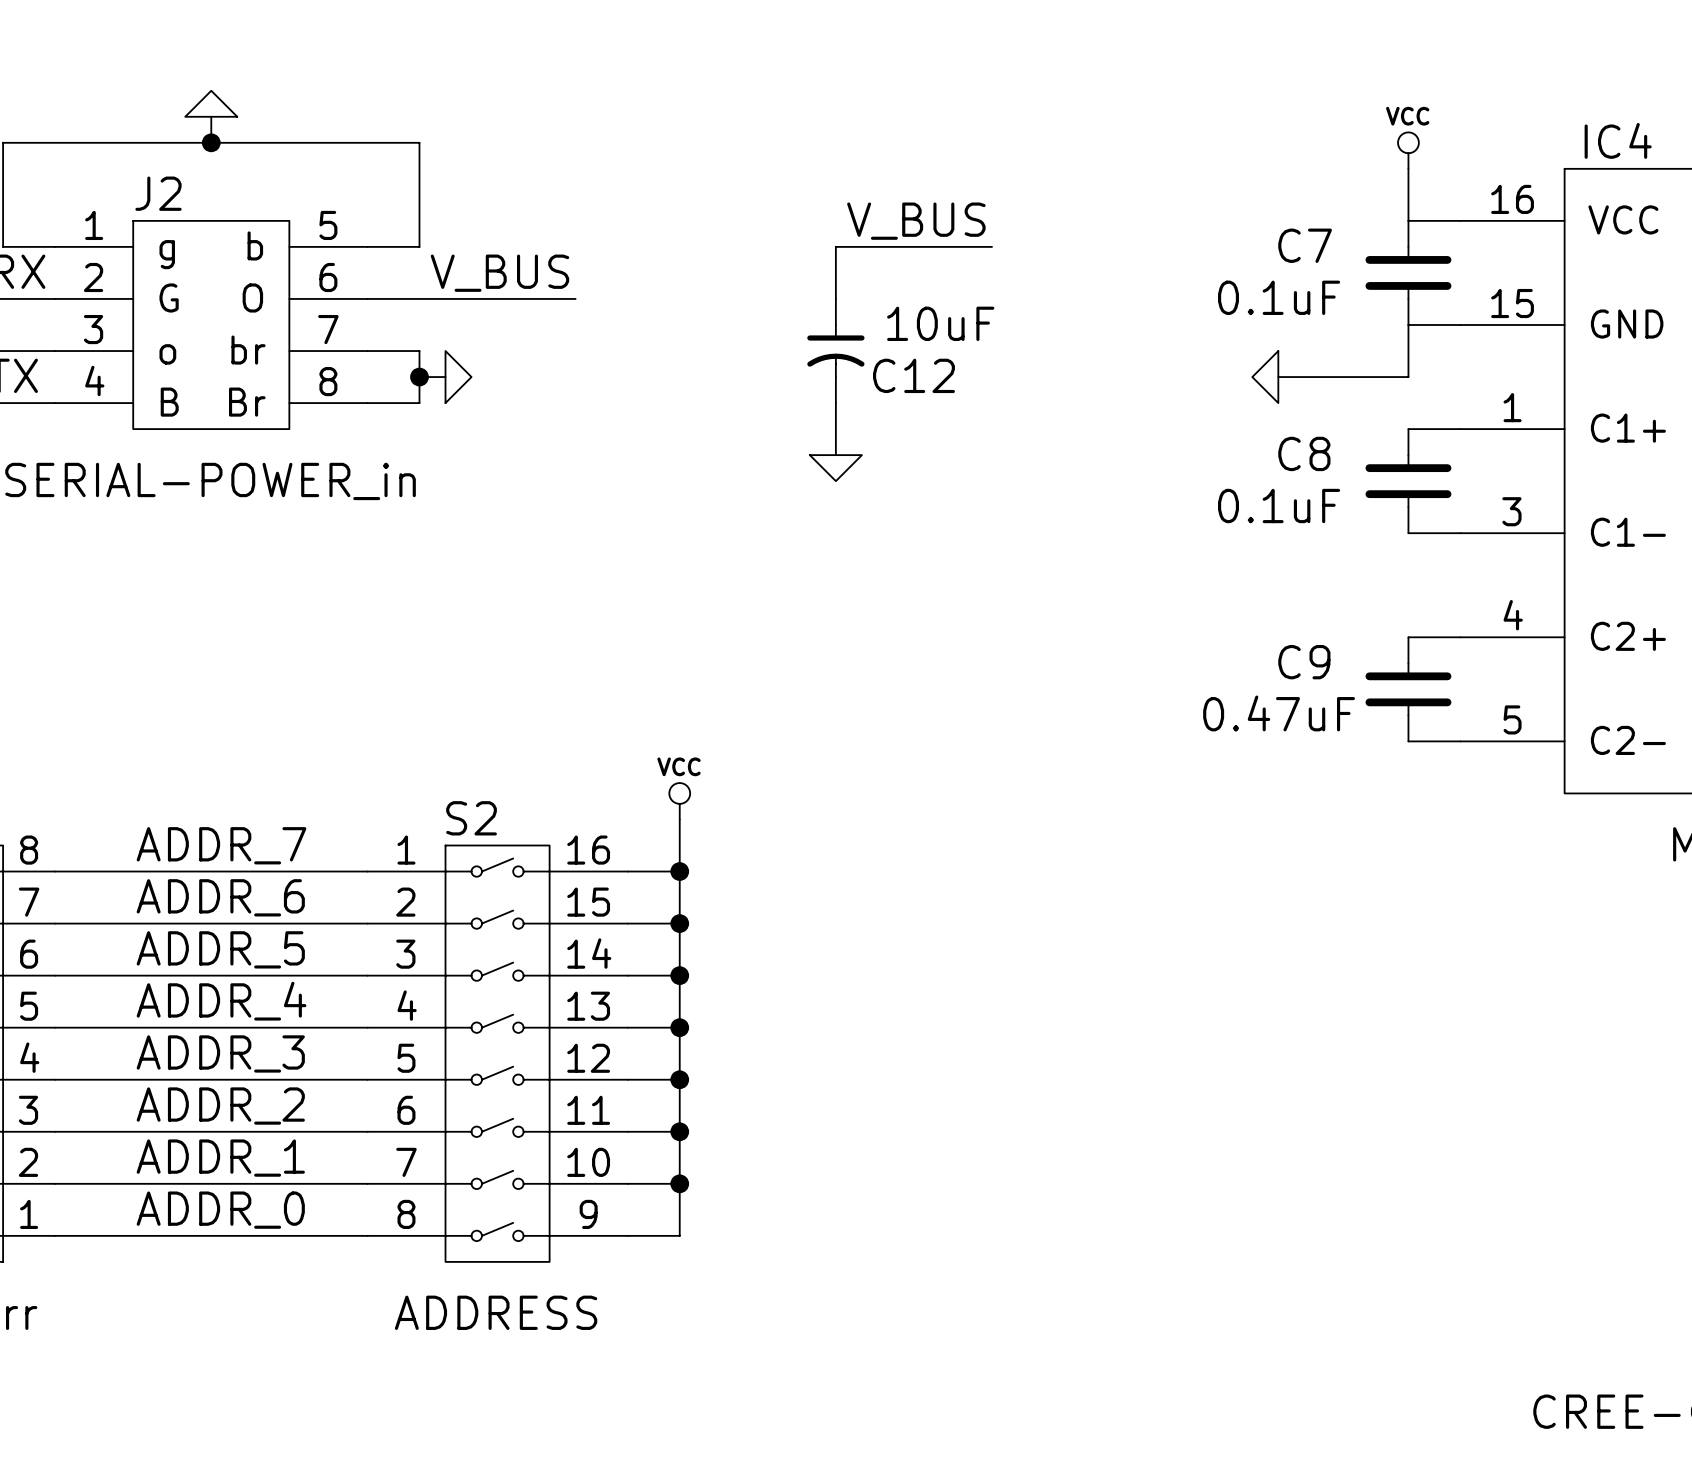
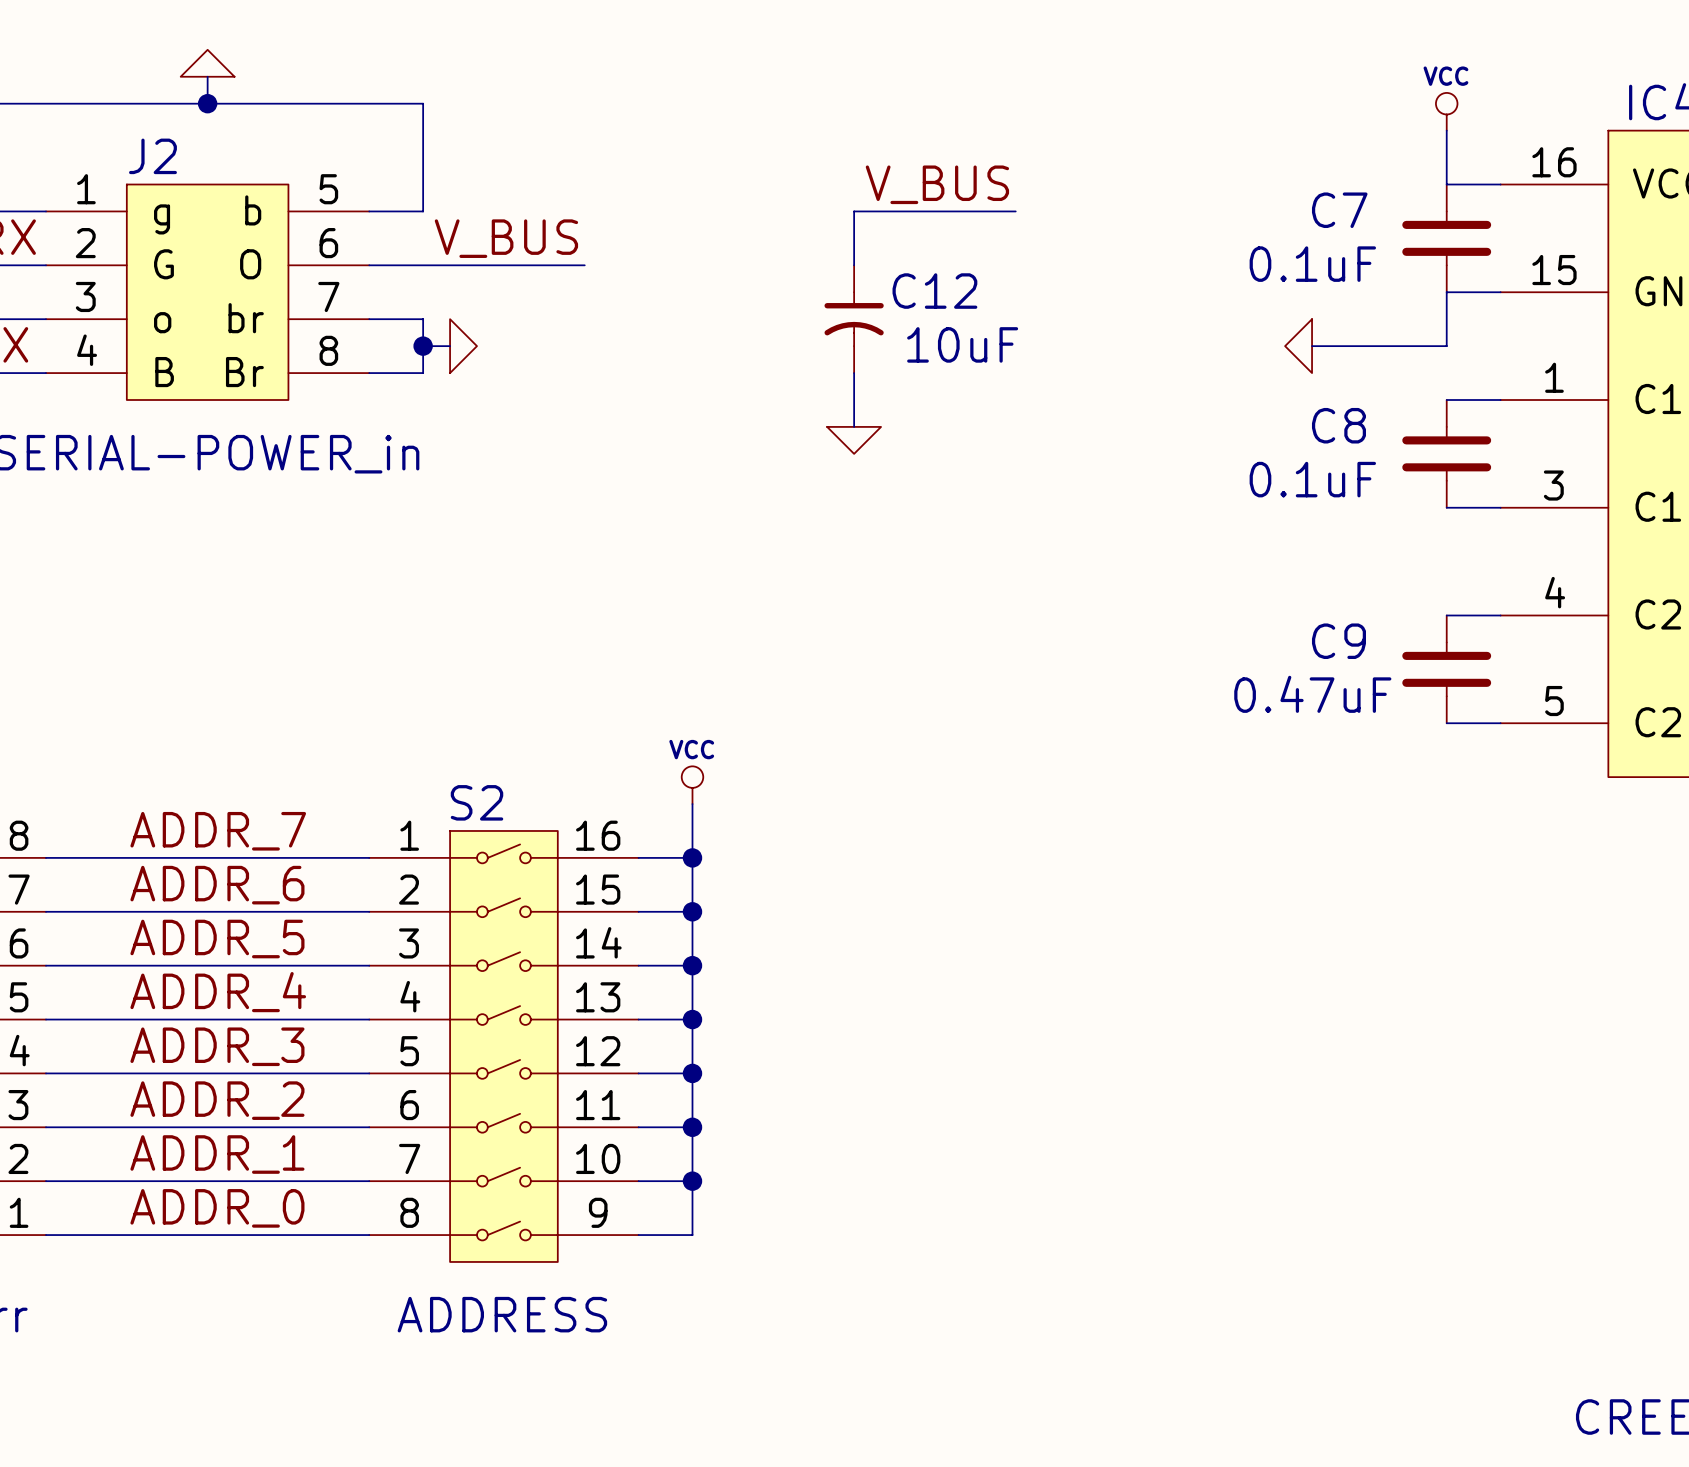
C12 value position: 10uF (940, 323) -> 10uF (962, 344)
C12 name position: C12 (913, 375) -> C12 (934, 291)

